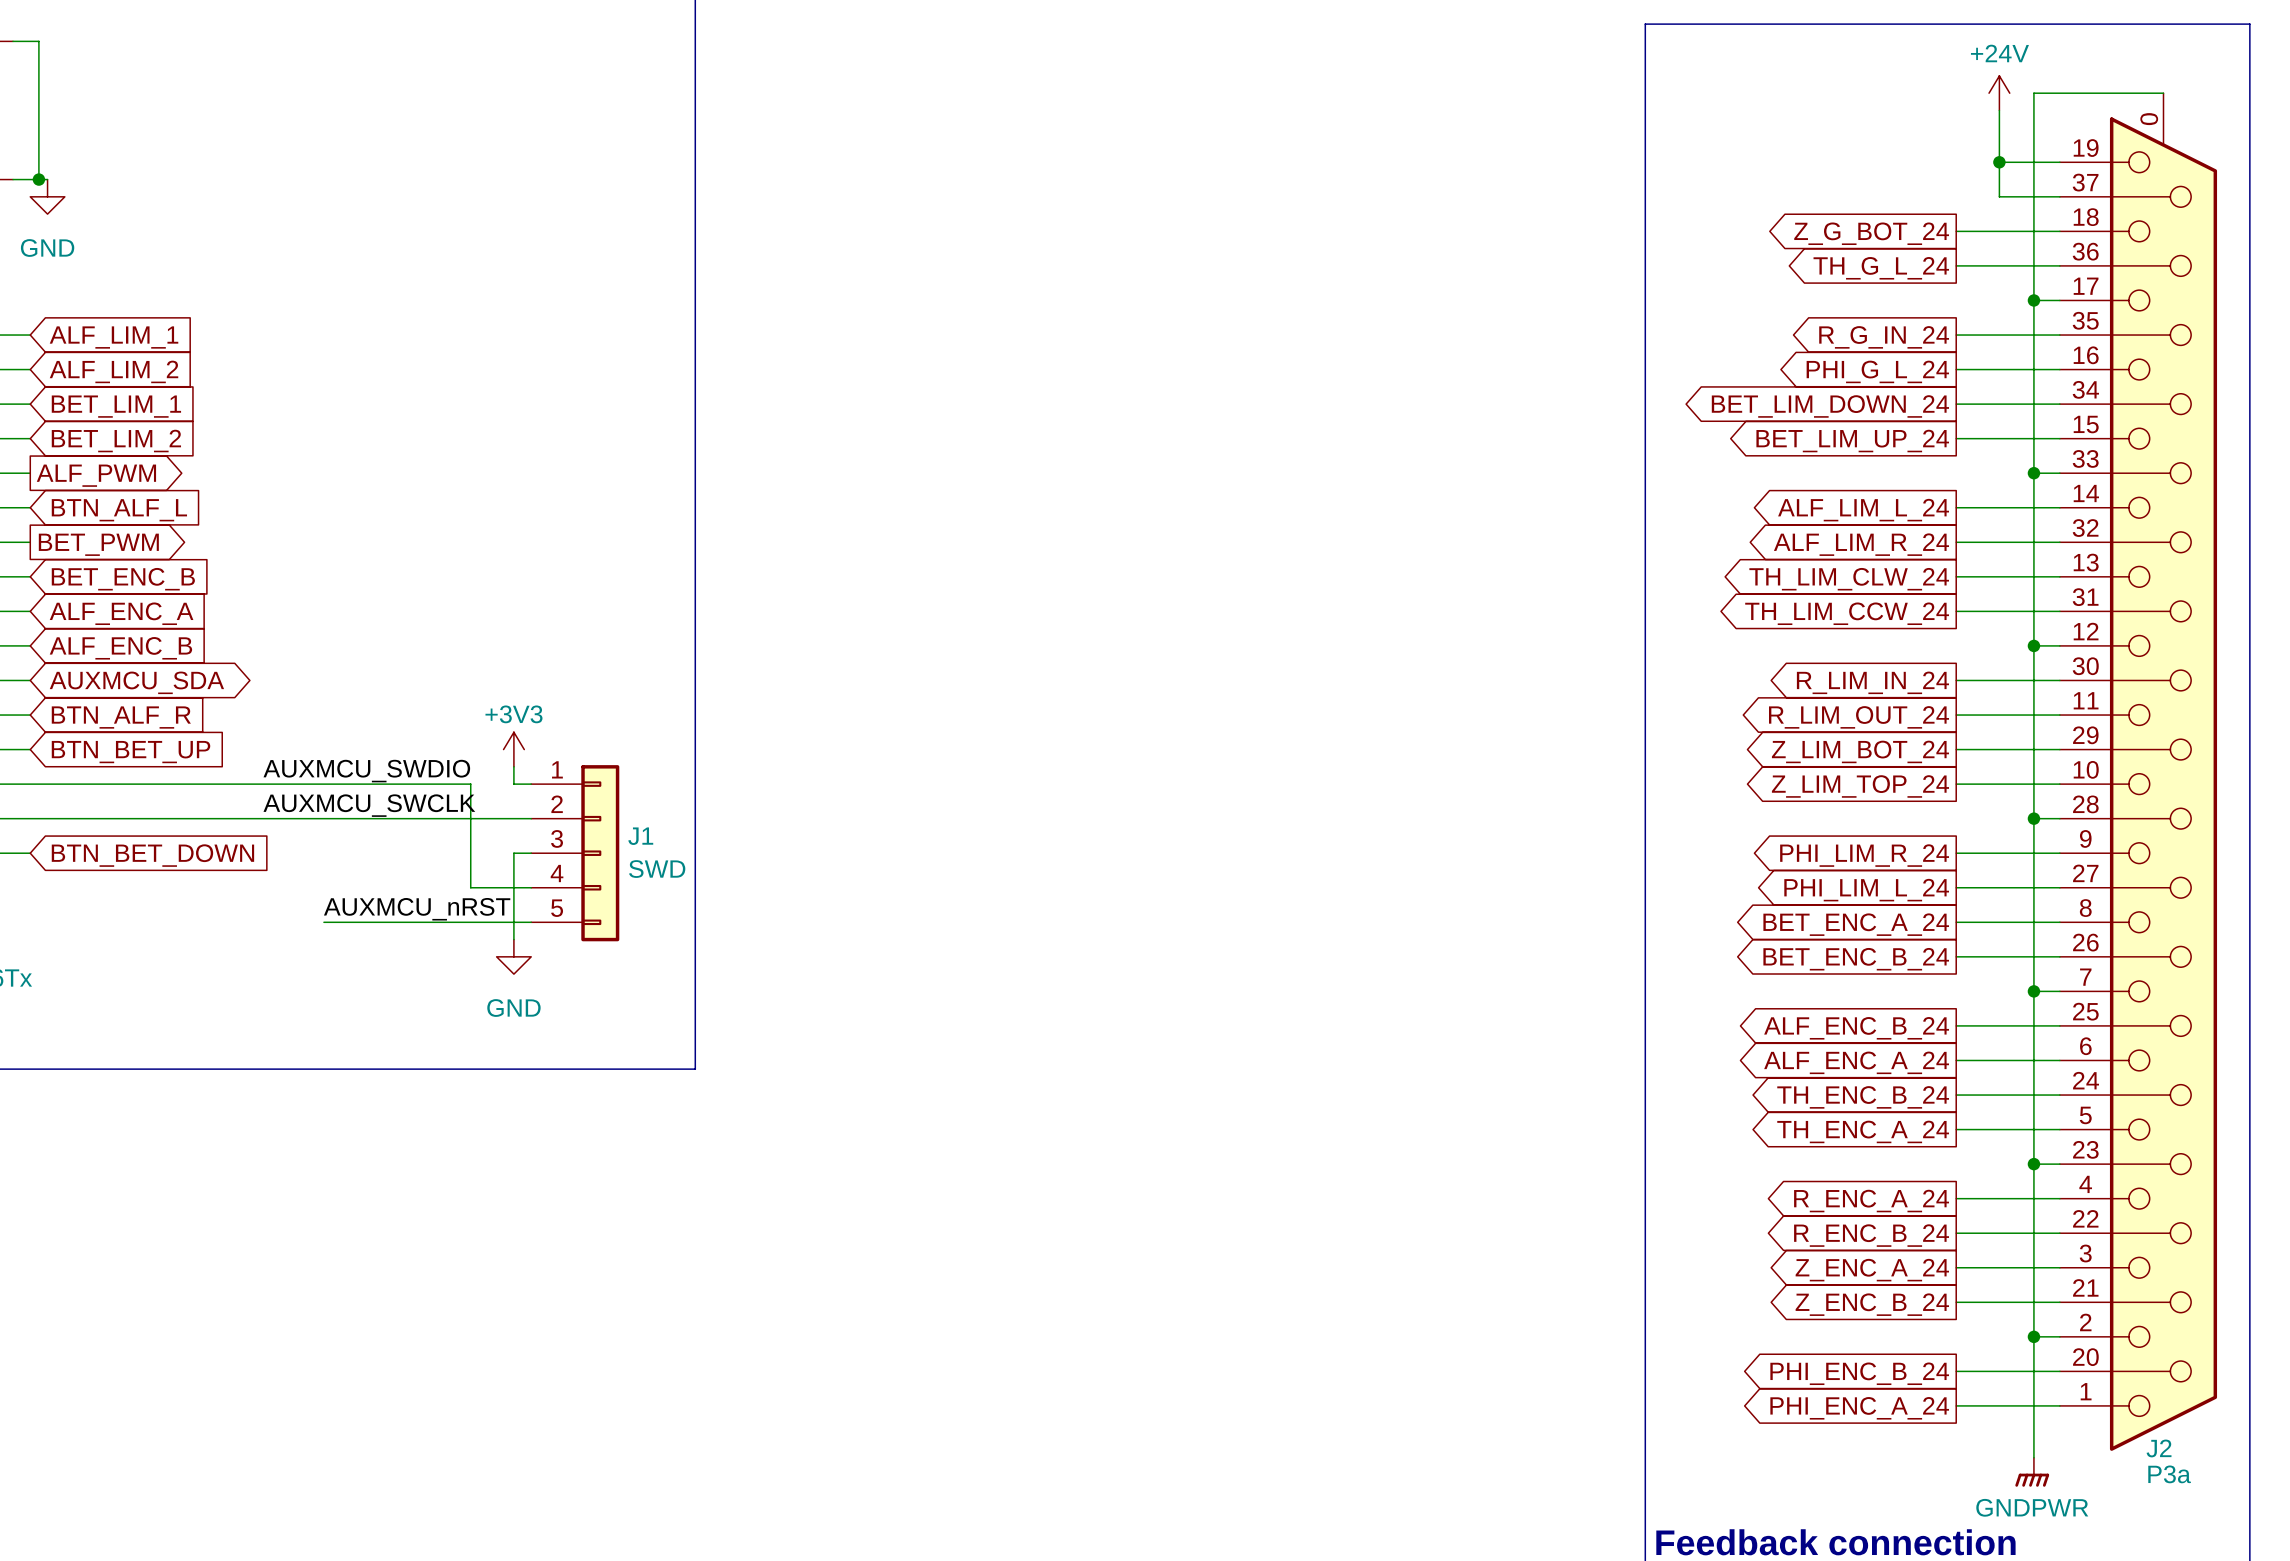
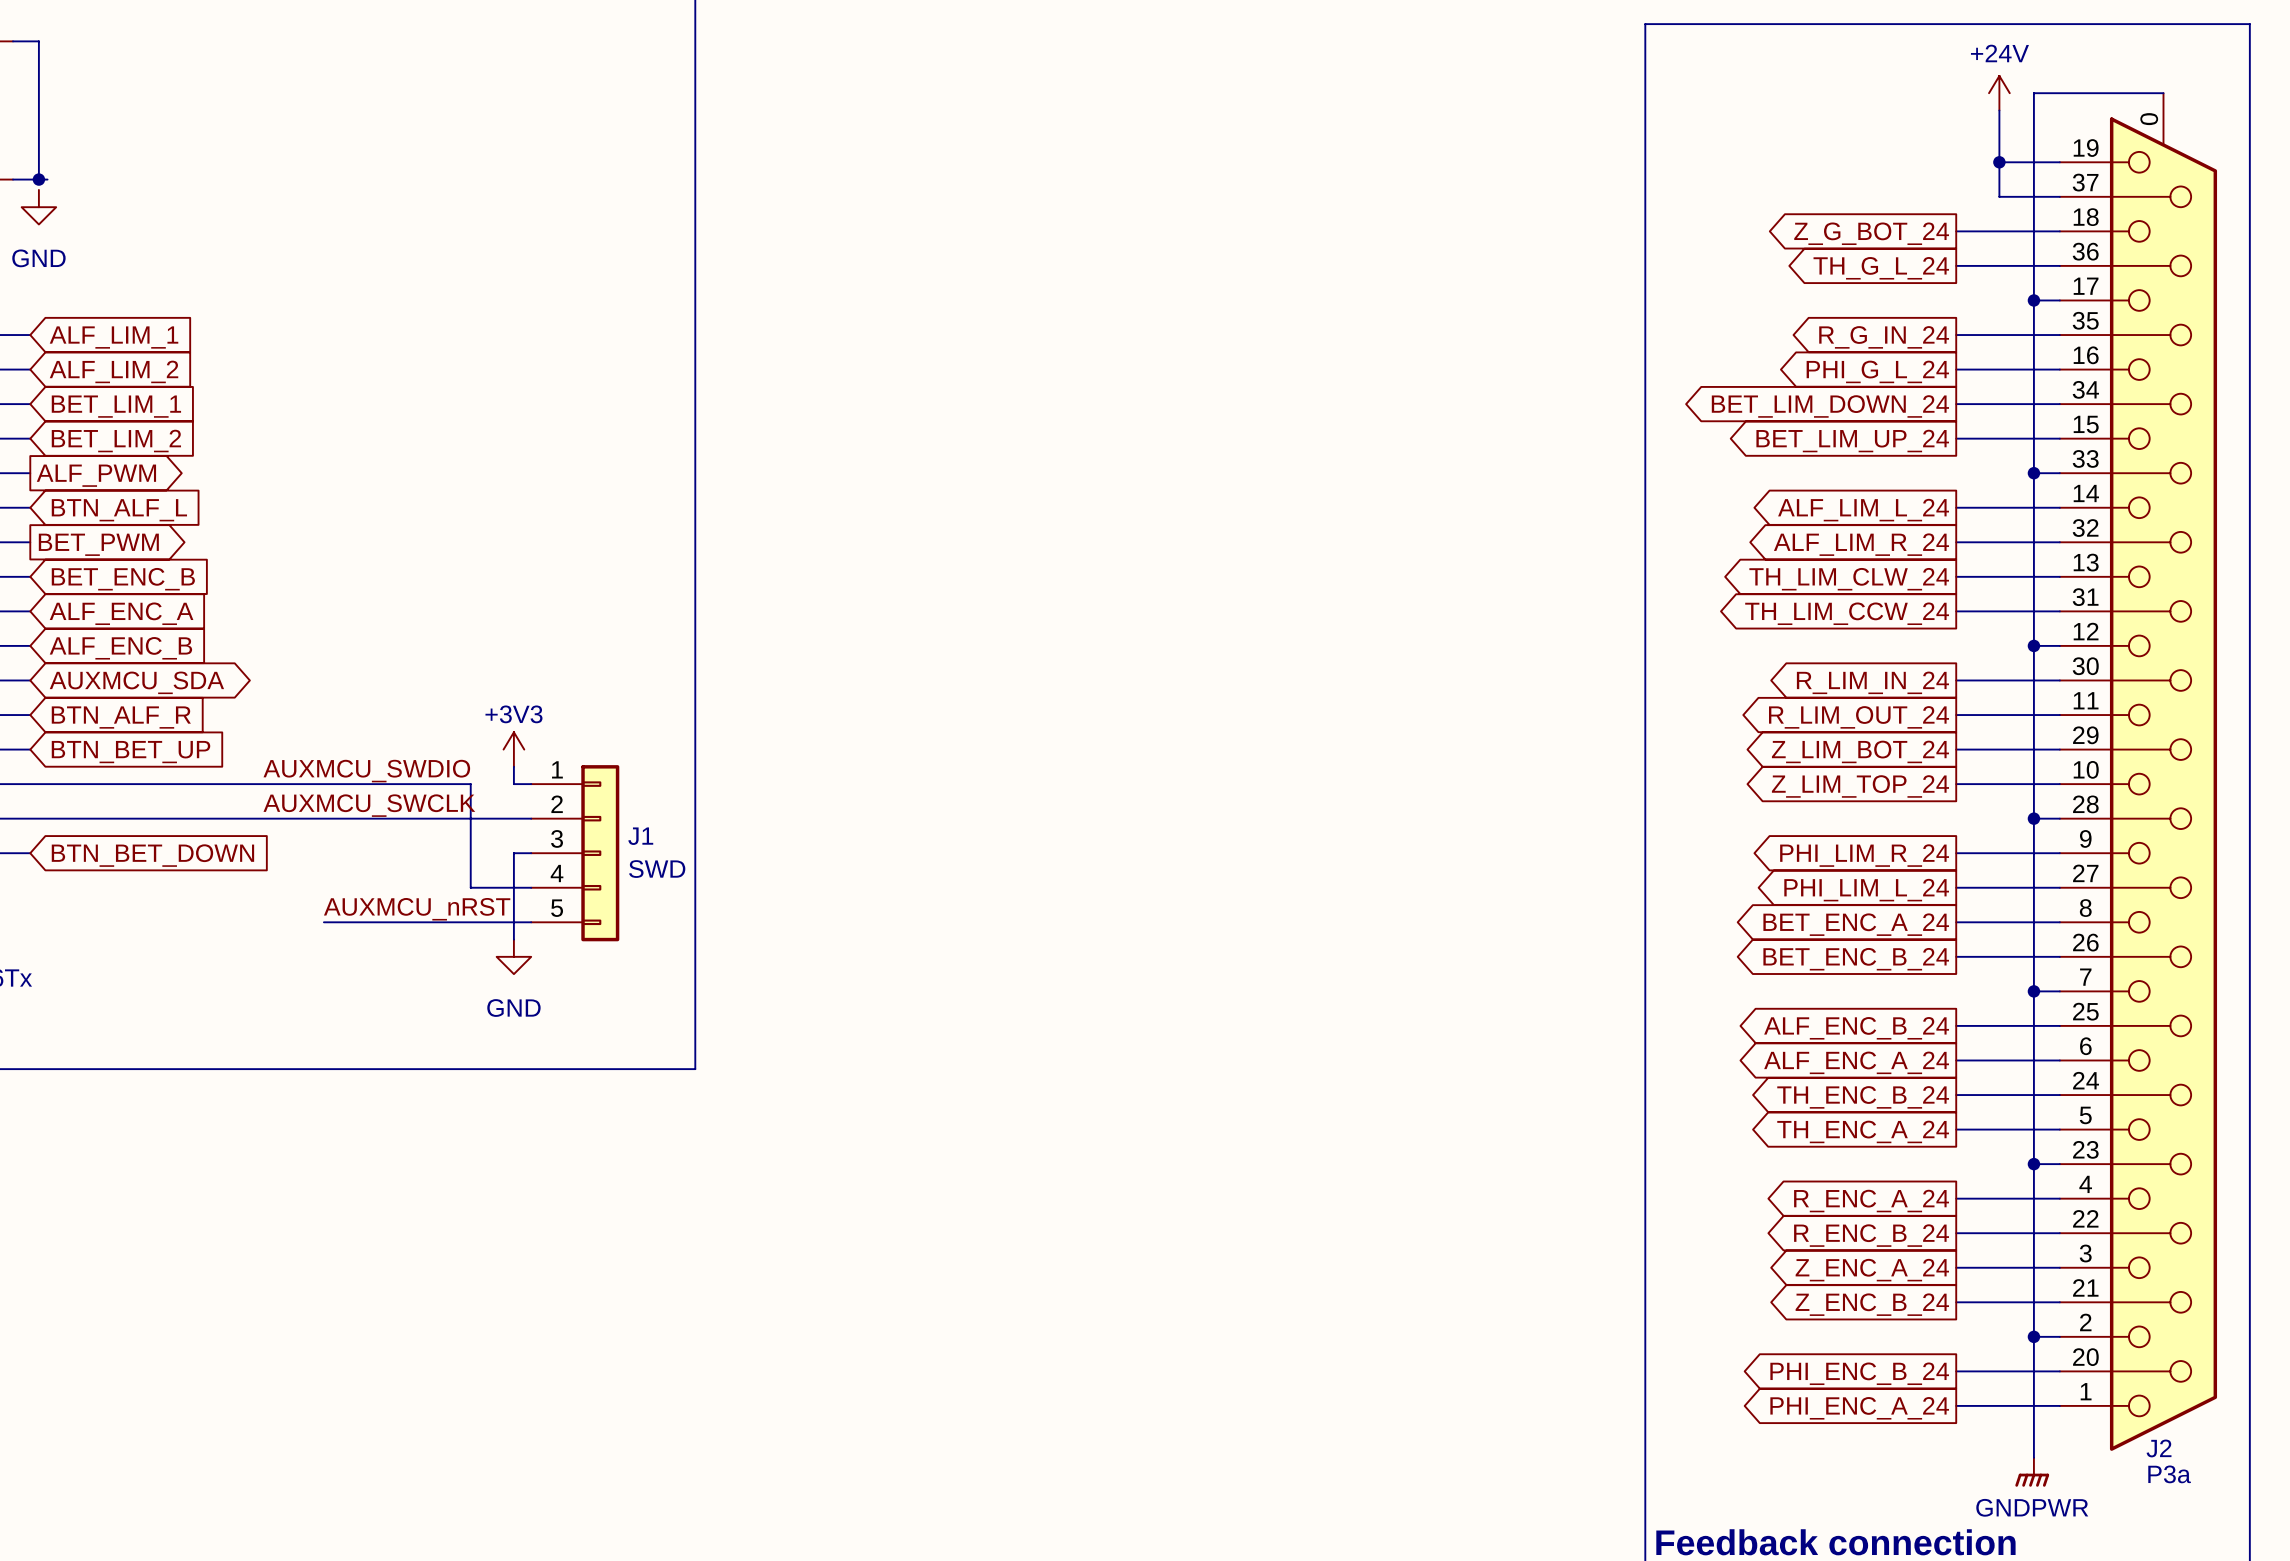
power symbol position: GND (47, 196) -> GND (38, 207)

